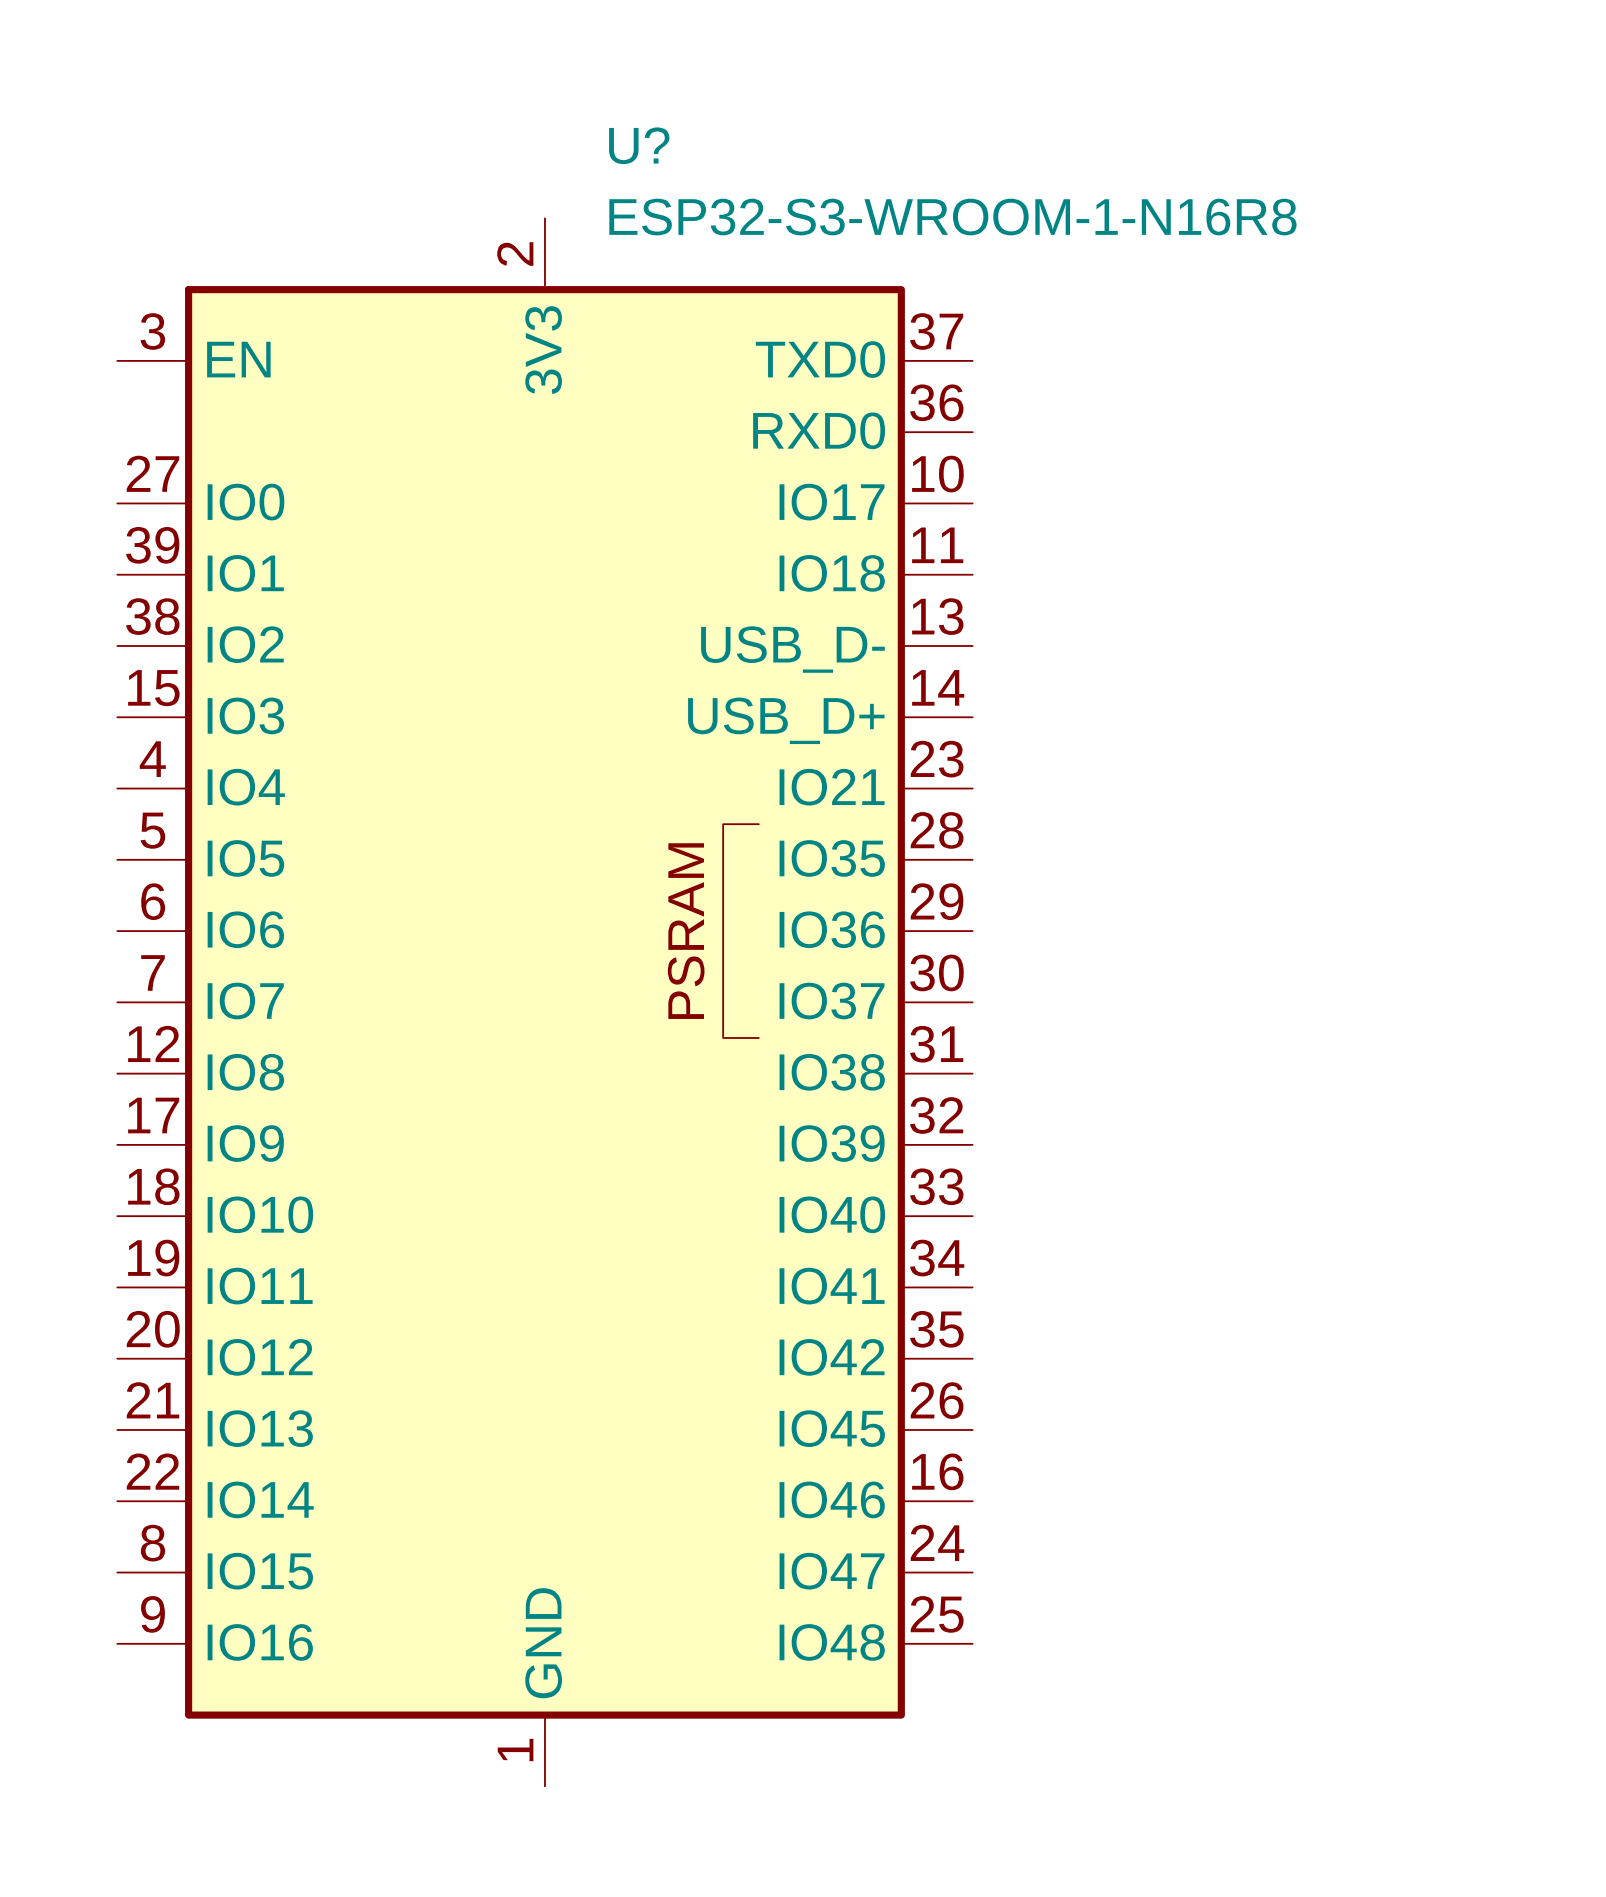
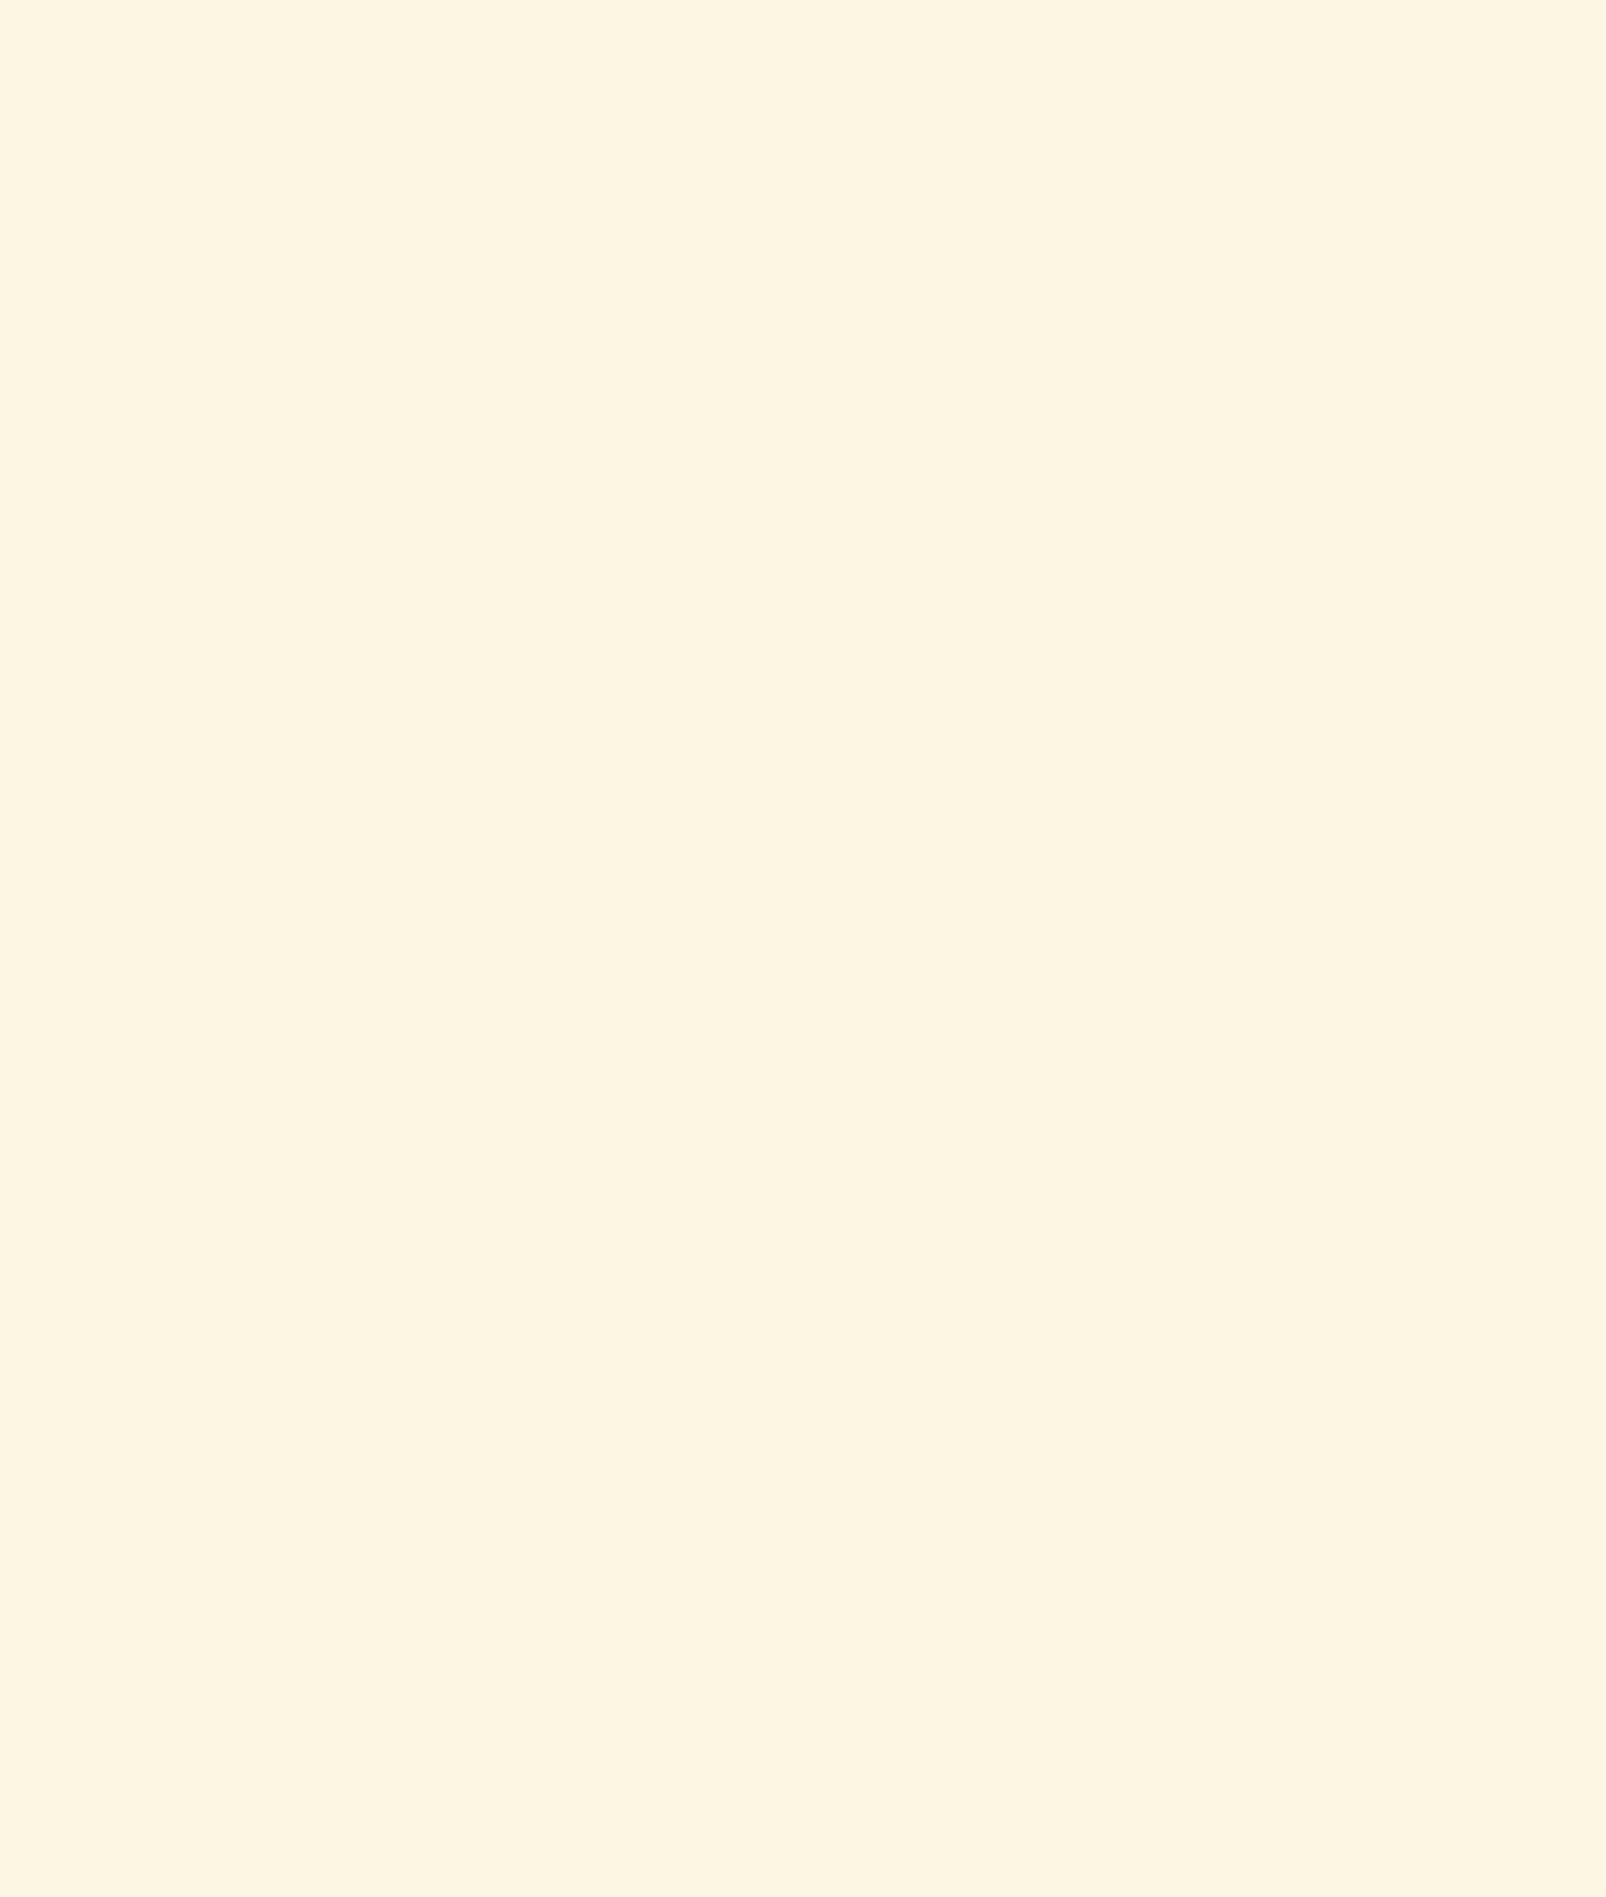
U?: ESP32-S3-WROOM-1-N16R8 (544, 1002) -> none

